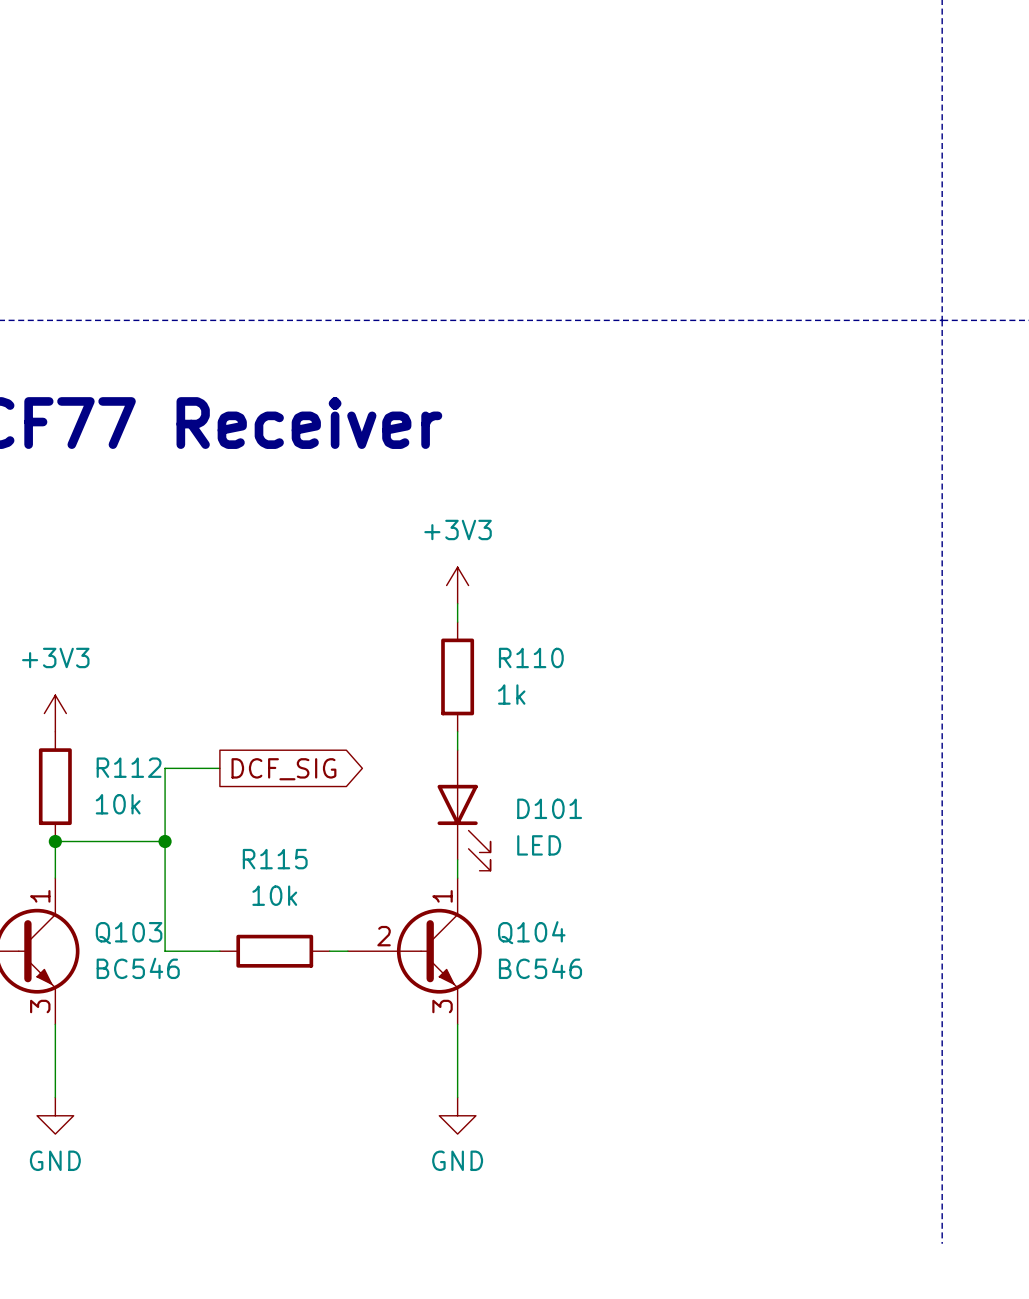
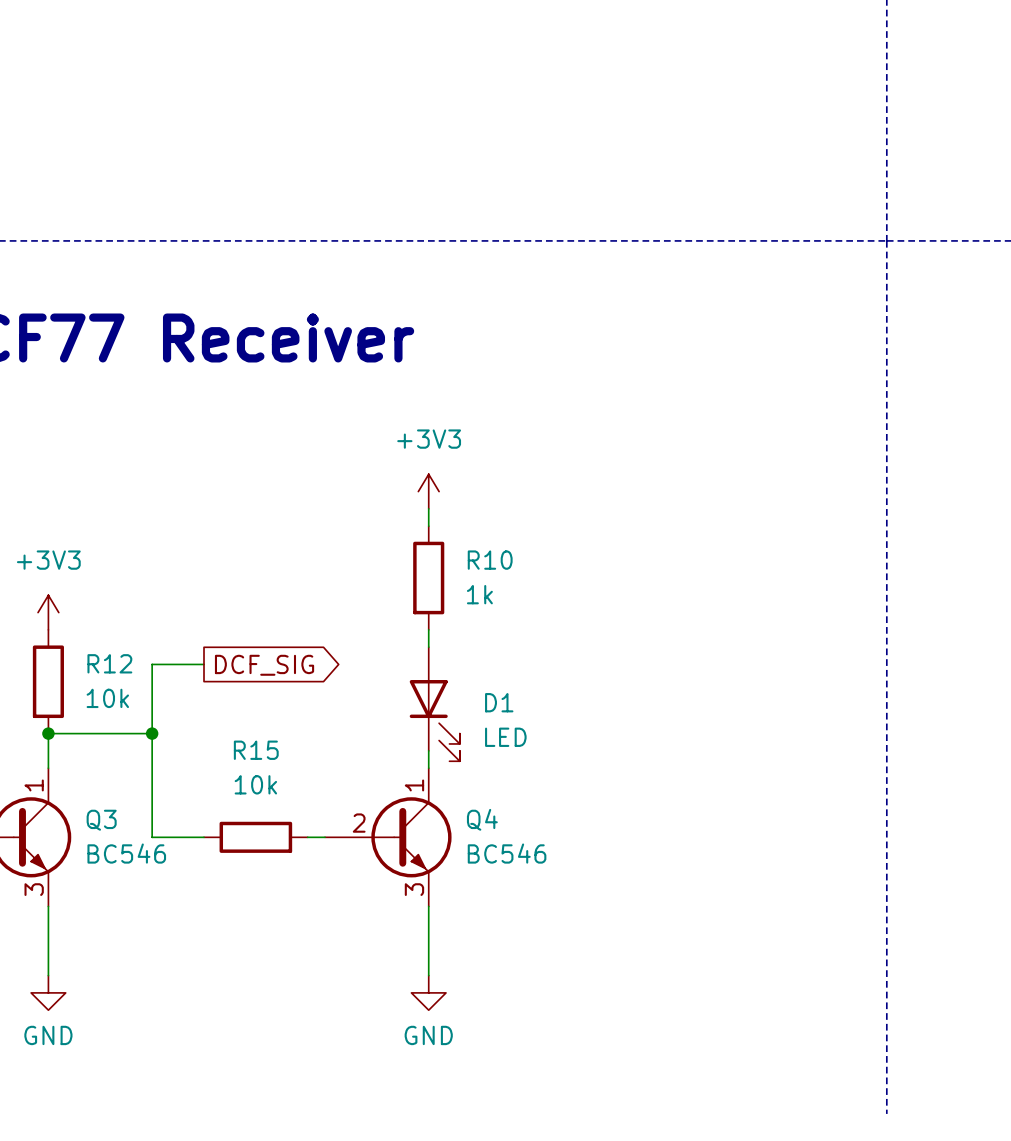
R110 name: R110 (531, 657) -> R10 (490, 560)
R112 name: R112 (129, 767) -> R12 (109, 663)
D101 name: D101 (549, 808) -> D1 (499, 702)
R115 name: R115 (275, 859) -> R15 (256, 750)
Q104 name: Q104 (531, 932) -> Q4 (482, 819)
Q103 name: Q103 (129, 933) -> Q3 (101, 820)

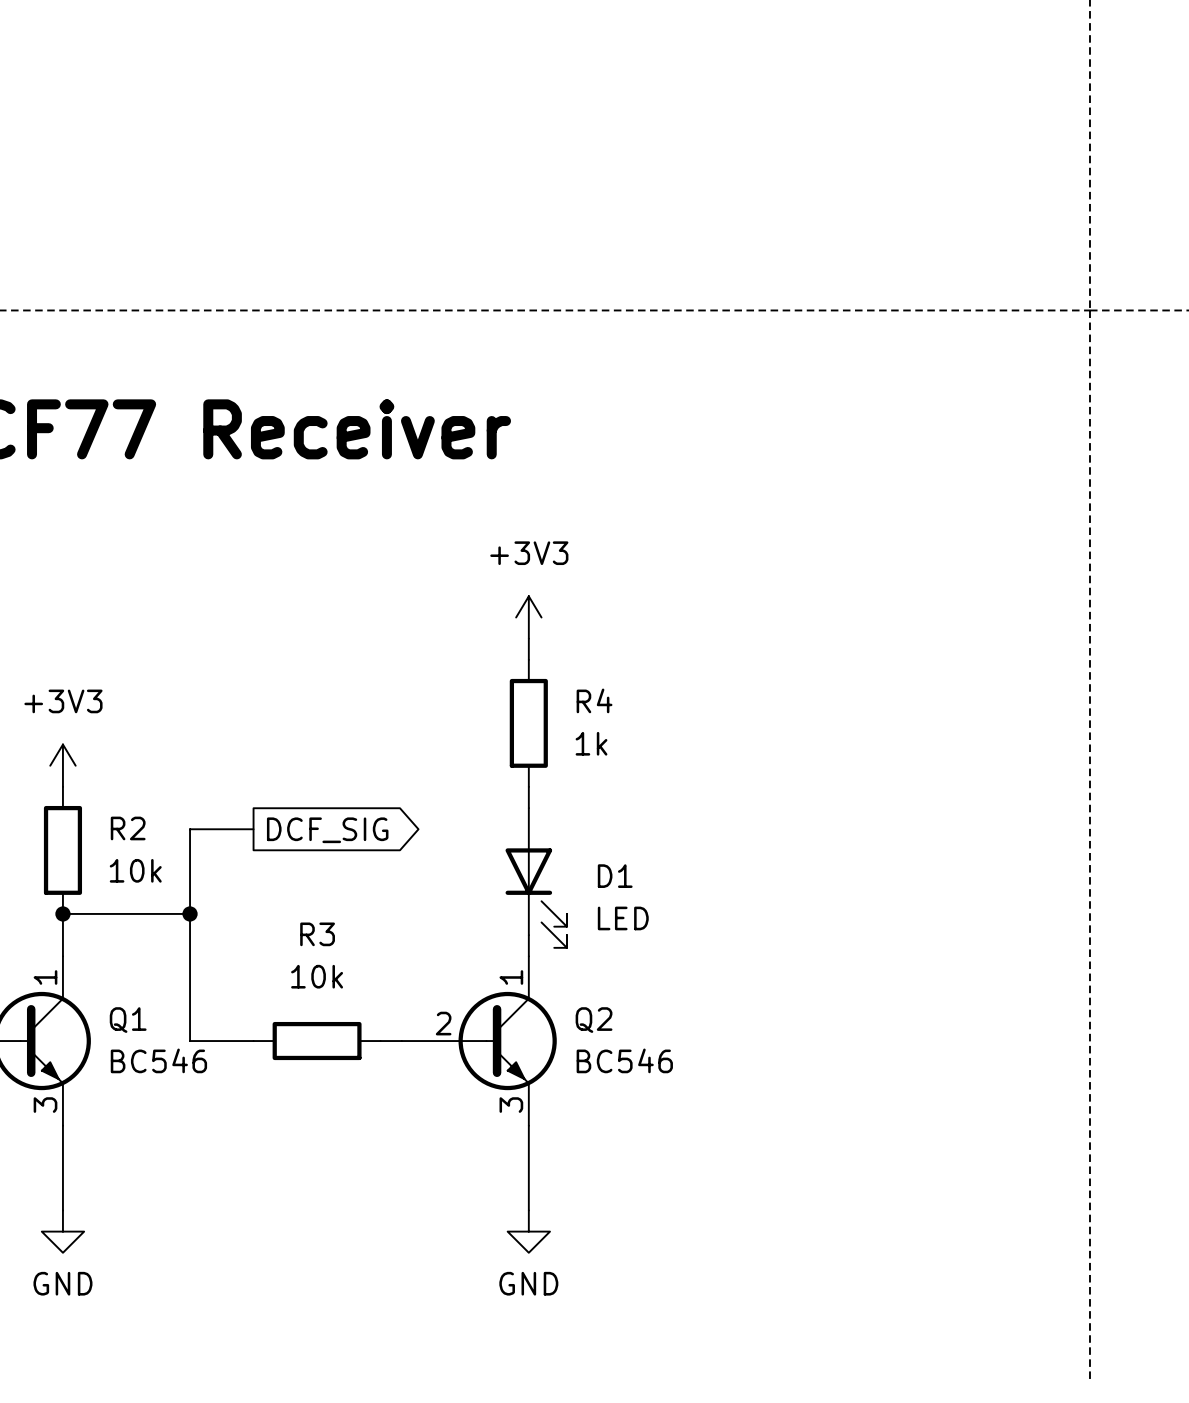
R10 name: R10 (490, 560) -> R4 (594, 700)
R12 name: R12 (109, 663) -> R2 (128, 828)
R15 name: R15 (256, 750) -> R3 (317, 934)
Q4 name: Q4 (482, 819) -> Q2 (594, 1020)
Q3 name: Q3 (101, 820) -> Q1 (128, 1020)

